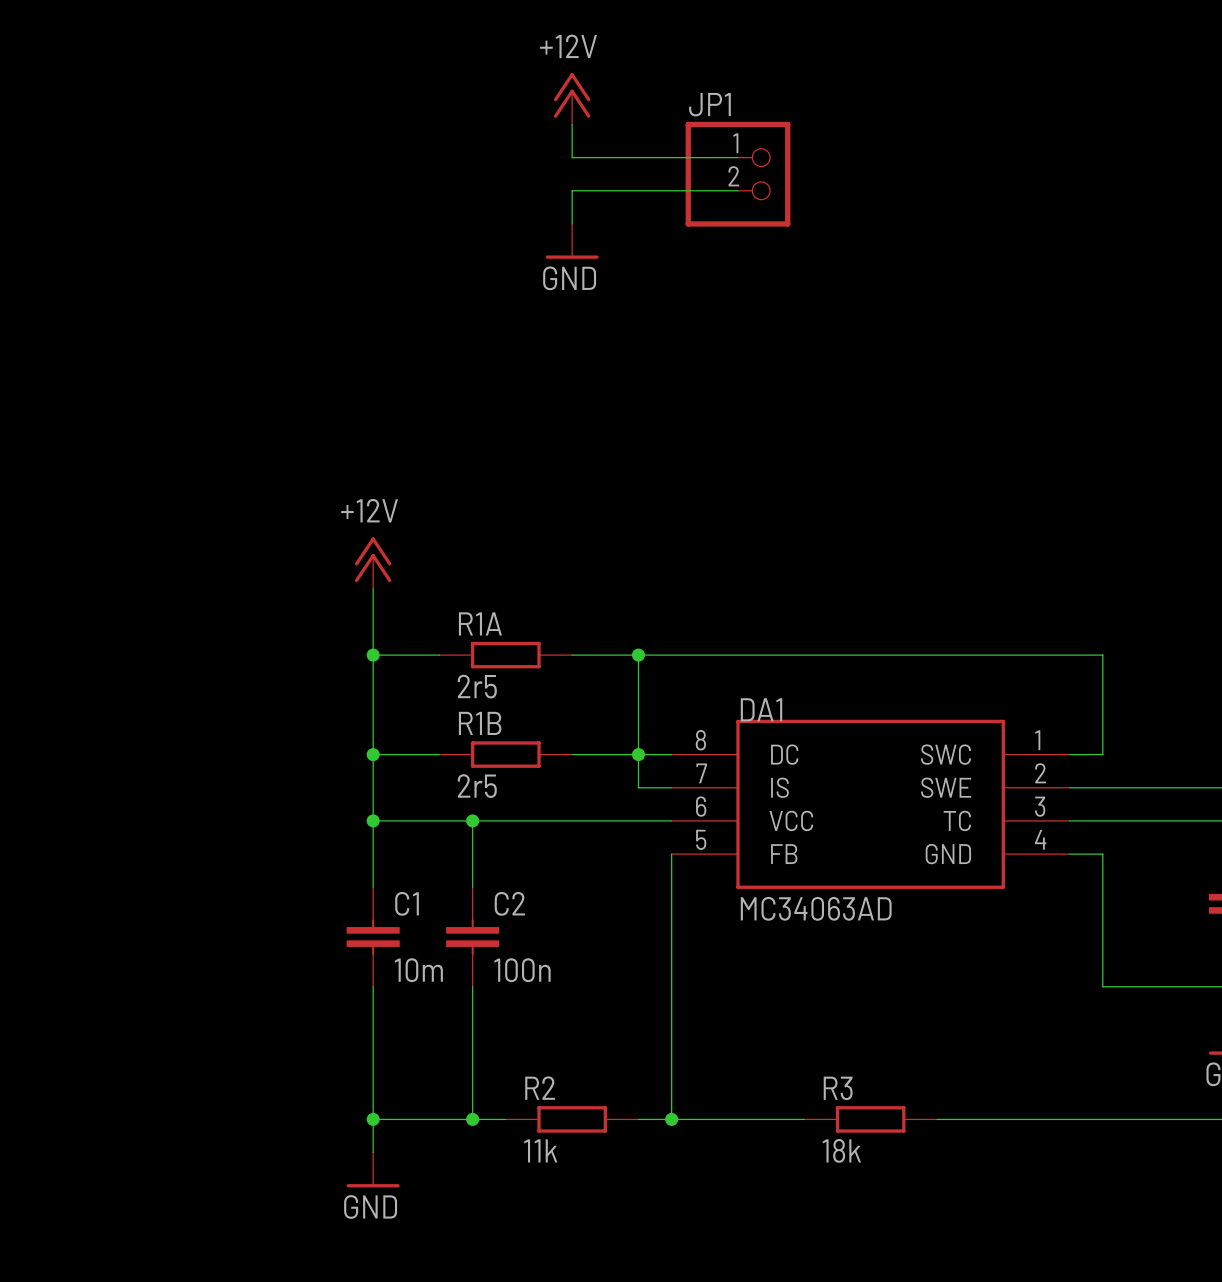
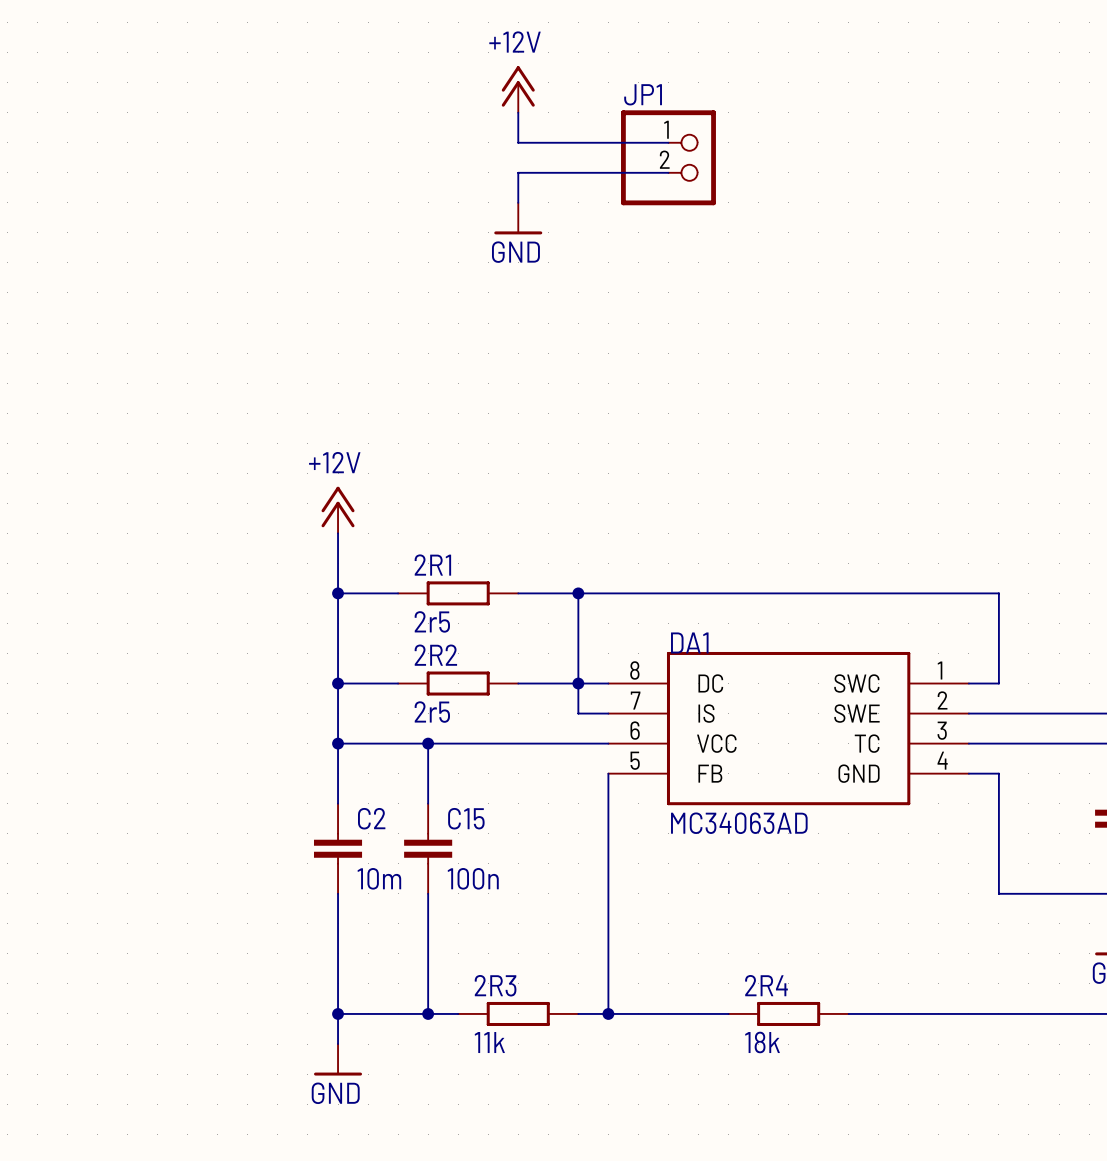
R1A name: R1A (480, 623) -> 2R1 (432, 565)
R1B name: R1B (480, 723) -> 2R2 (435, 655)
C1 name: C1 (407, 903) -> C2 (371, 818)
C2 name: C2 (509, 903) -> C15 (466, 818)
R2 name: R2 (540, 1088) -> 2R3 (495, 985)
R3 name: R3 (838, 1088) -> 2R4 (766, 985)

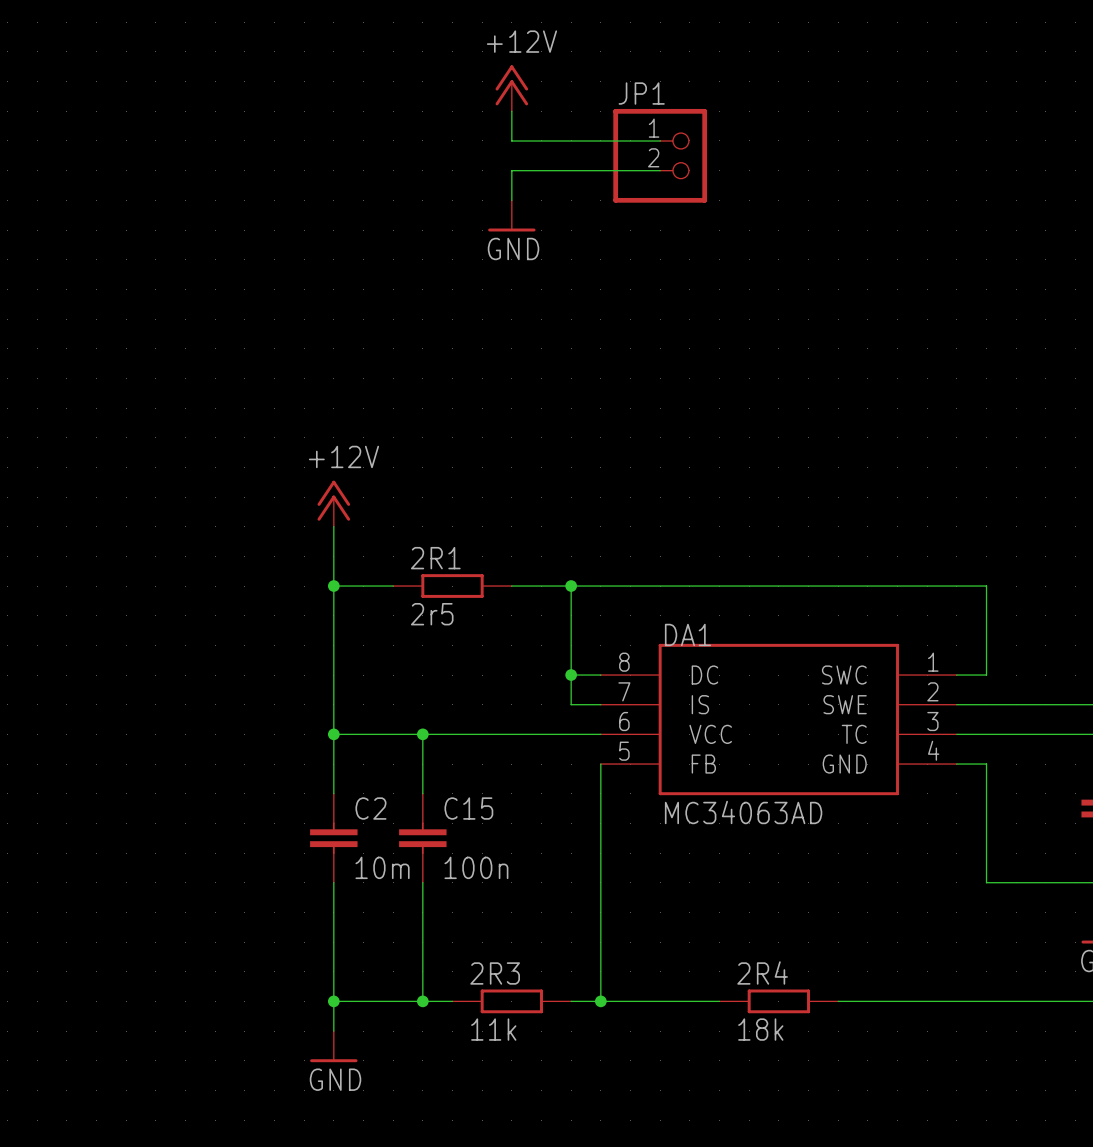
wire: (338, 683) (398, 683) -> none
junction: (338, 683) -> none
2R2: 2r5 (458, 683) -> none
wire: (518, 683) (578, 683) -> none

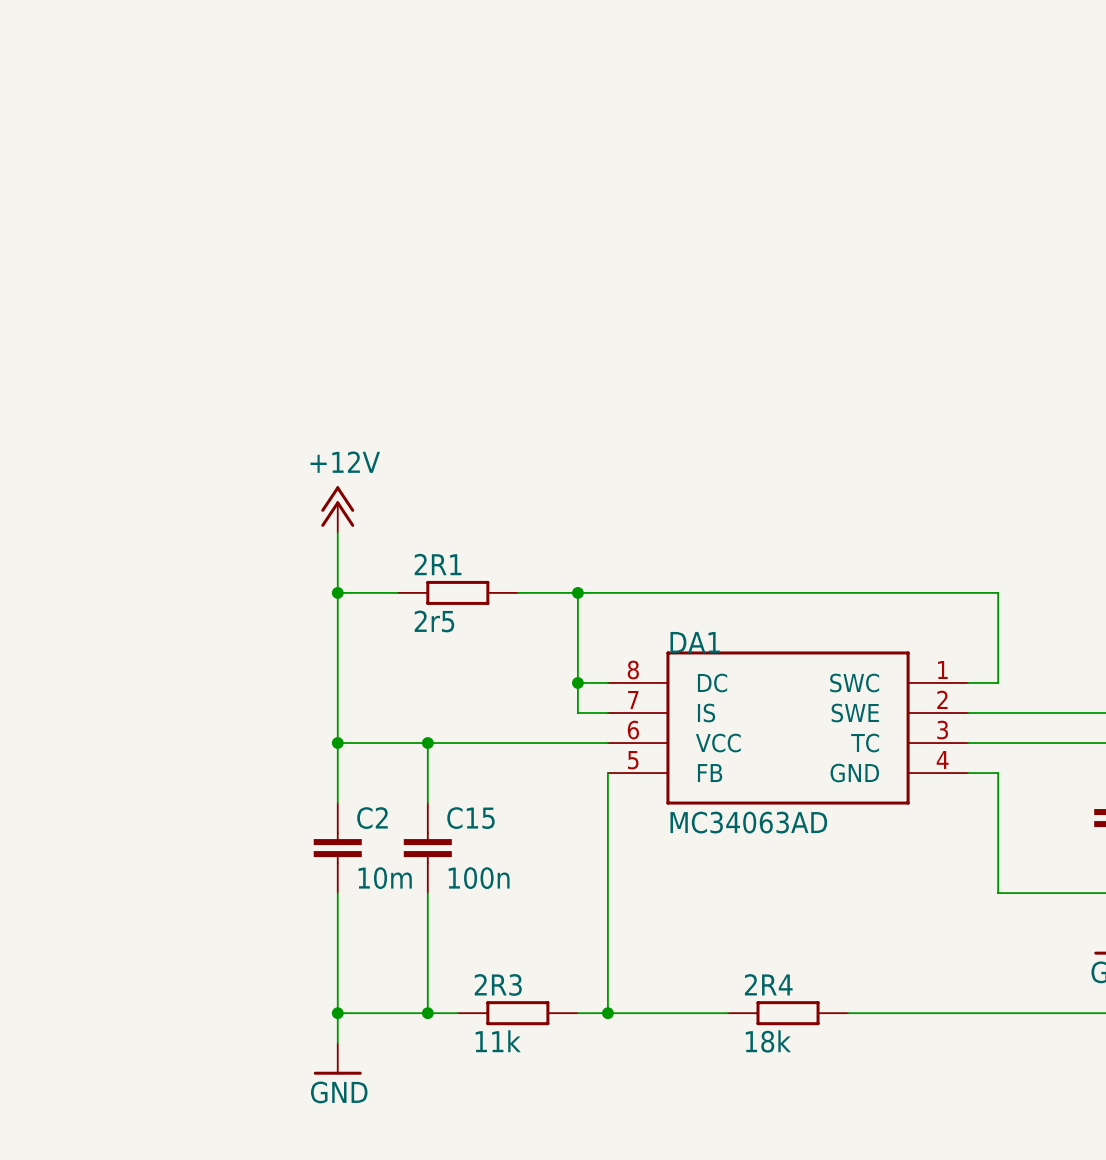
power symbol: +12V (511, 88) -> none
wire: (511, 111) (511, 140) (660, 140) -> none
JP1: (660, 155) -> none
wire: (660, 170) (511, 170) (511, 200) -> none
power symbol: GND (511, 215) -> none

